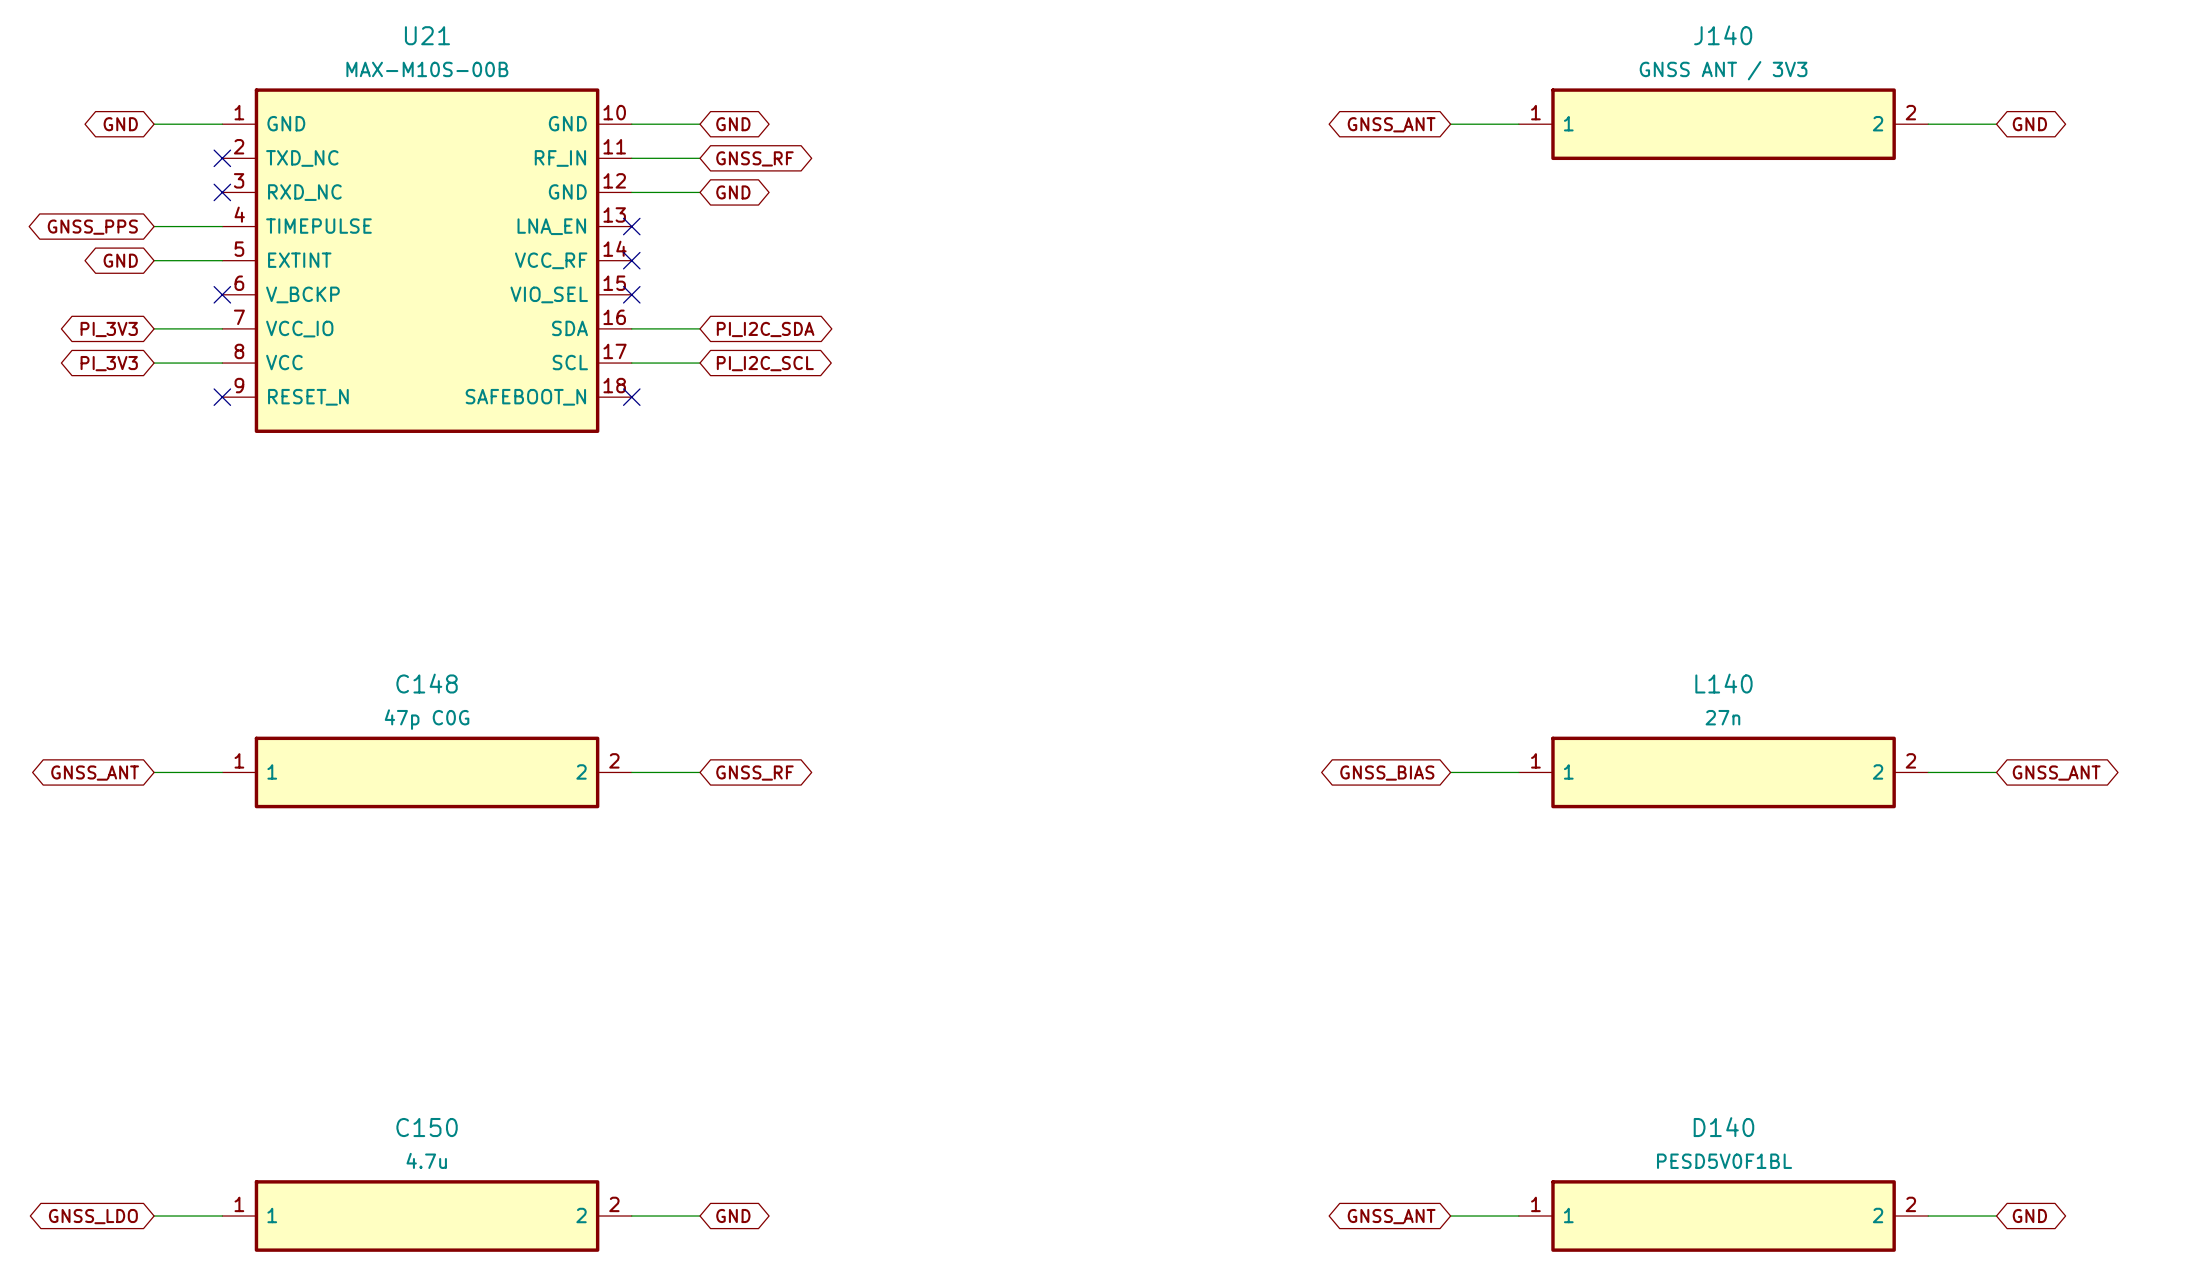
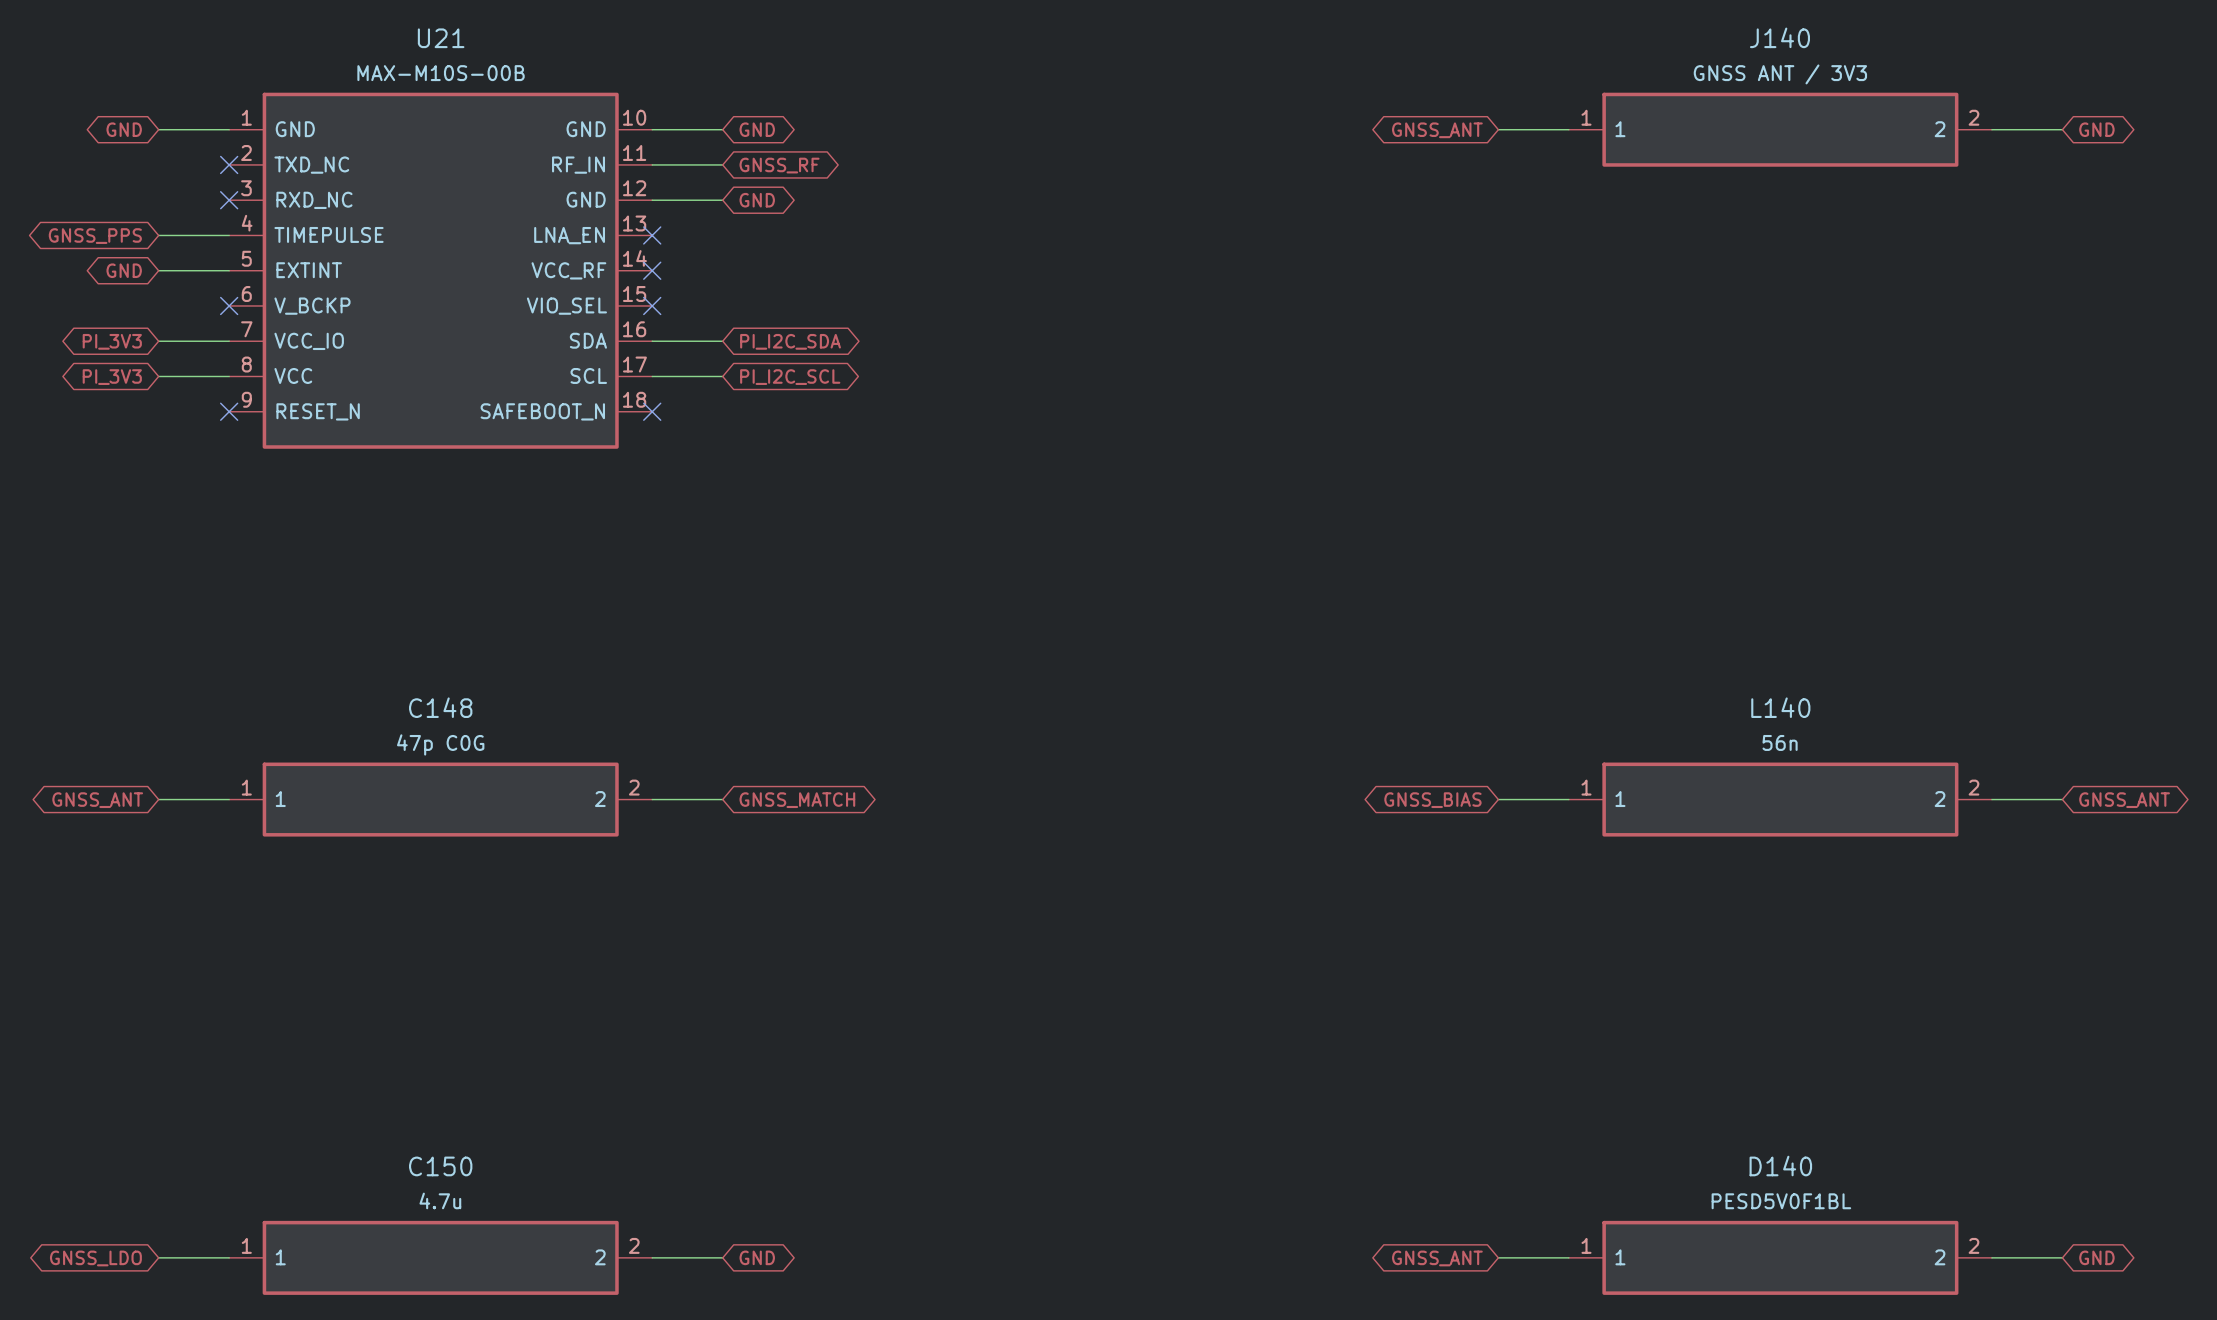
L140 value: 27n (1722, 717) -> 56n (1780, 742)
global label: GNSS_RF (754, 773) -> GNSS_MATCH (797, 800)

